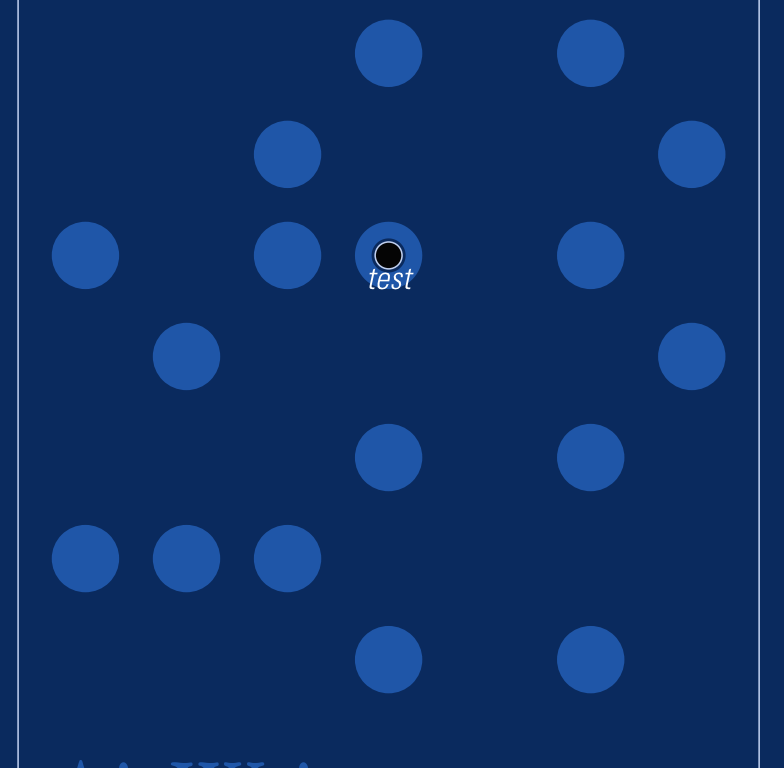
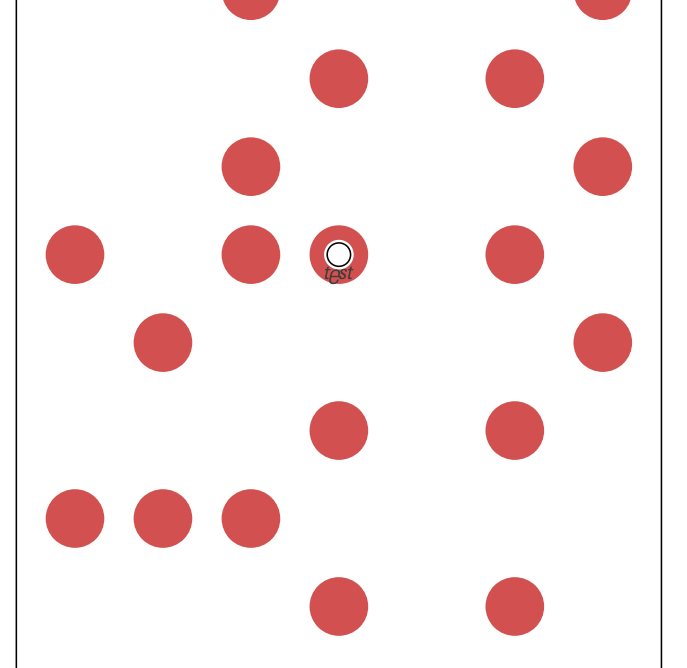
drawing shape: [369, 268, 378, 290] -> [324, 266, 331, 280]
drawing: none -> [339, 266, 354, 280]
drawing: [391, 268, 414, 290] -> none

